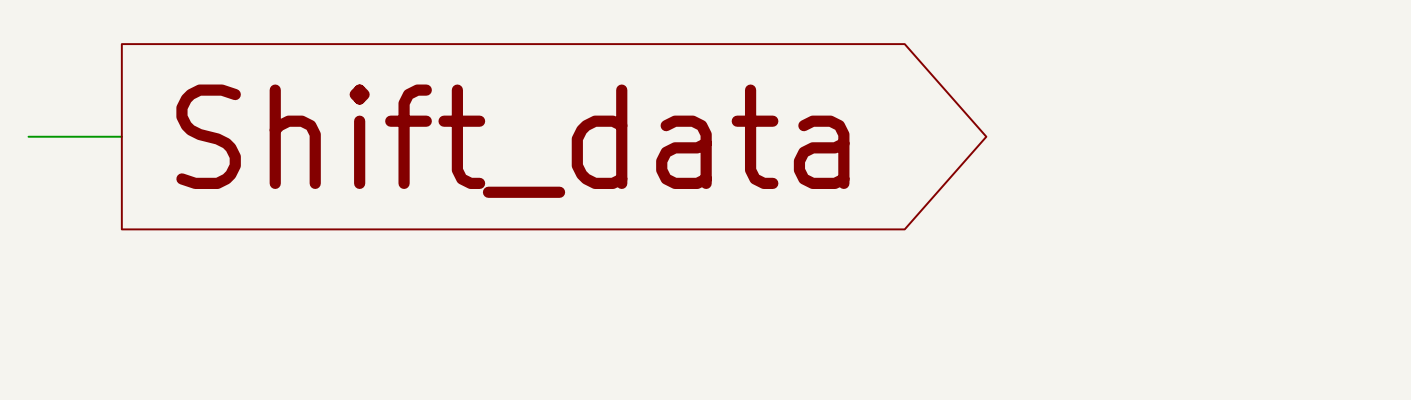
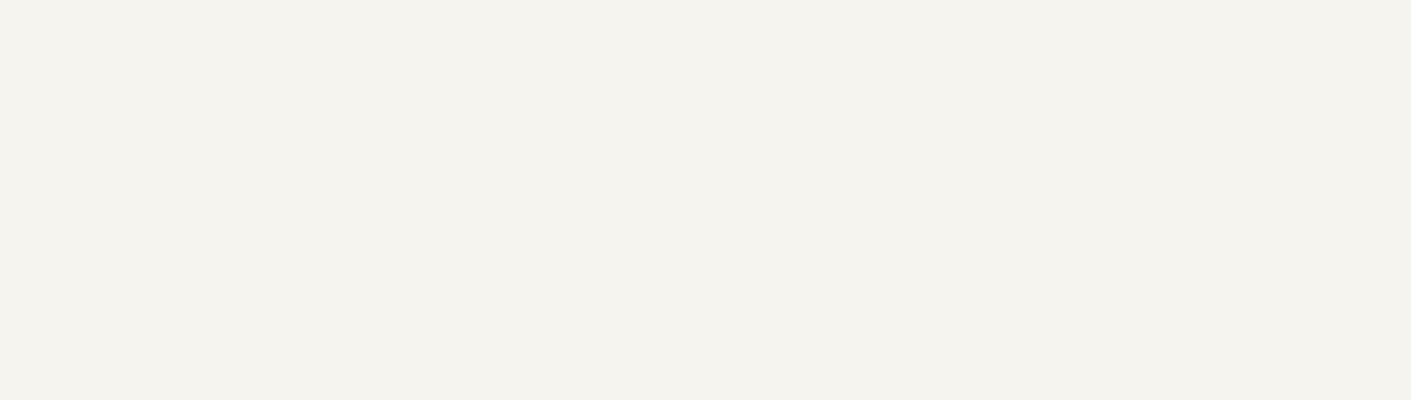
wire: (28, 136) (121, 136) -> none
global label: Shift_data (512, 141) -> none

